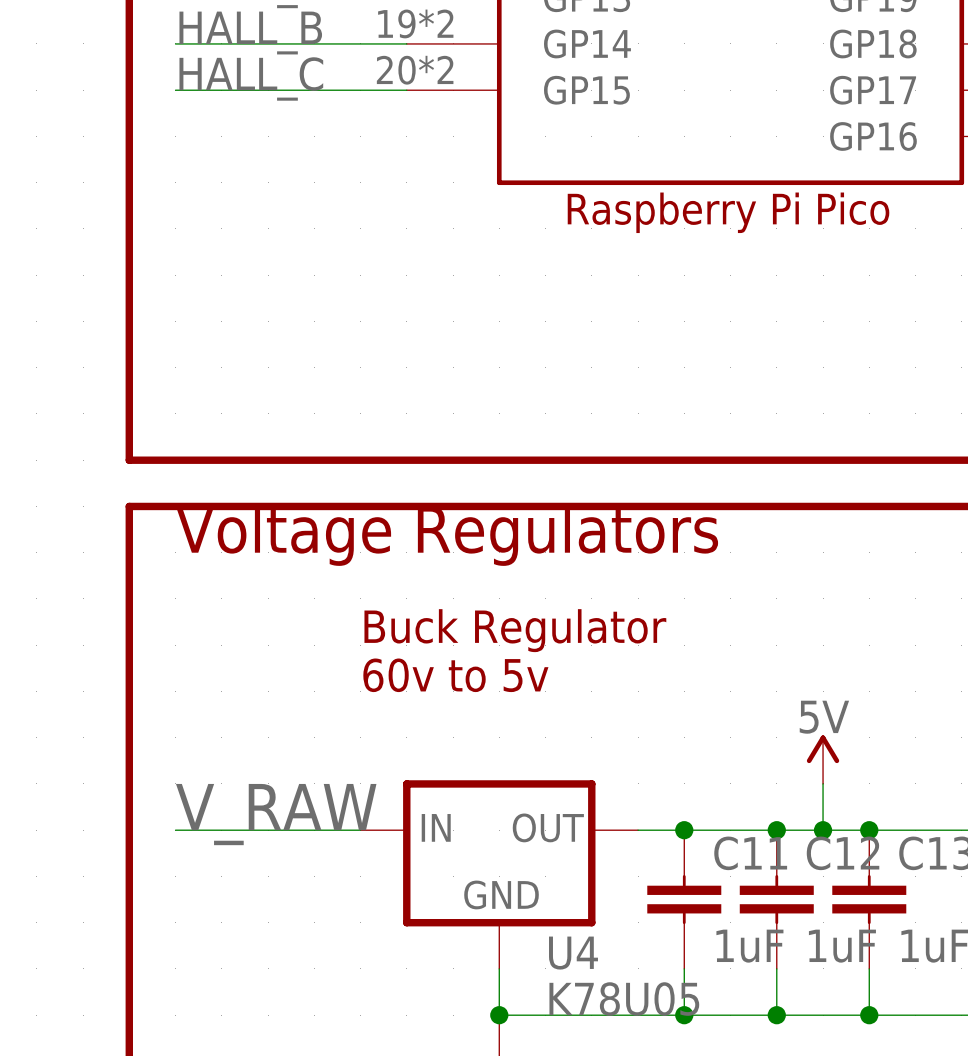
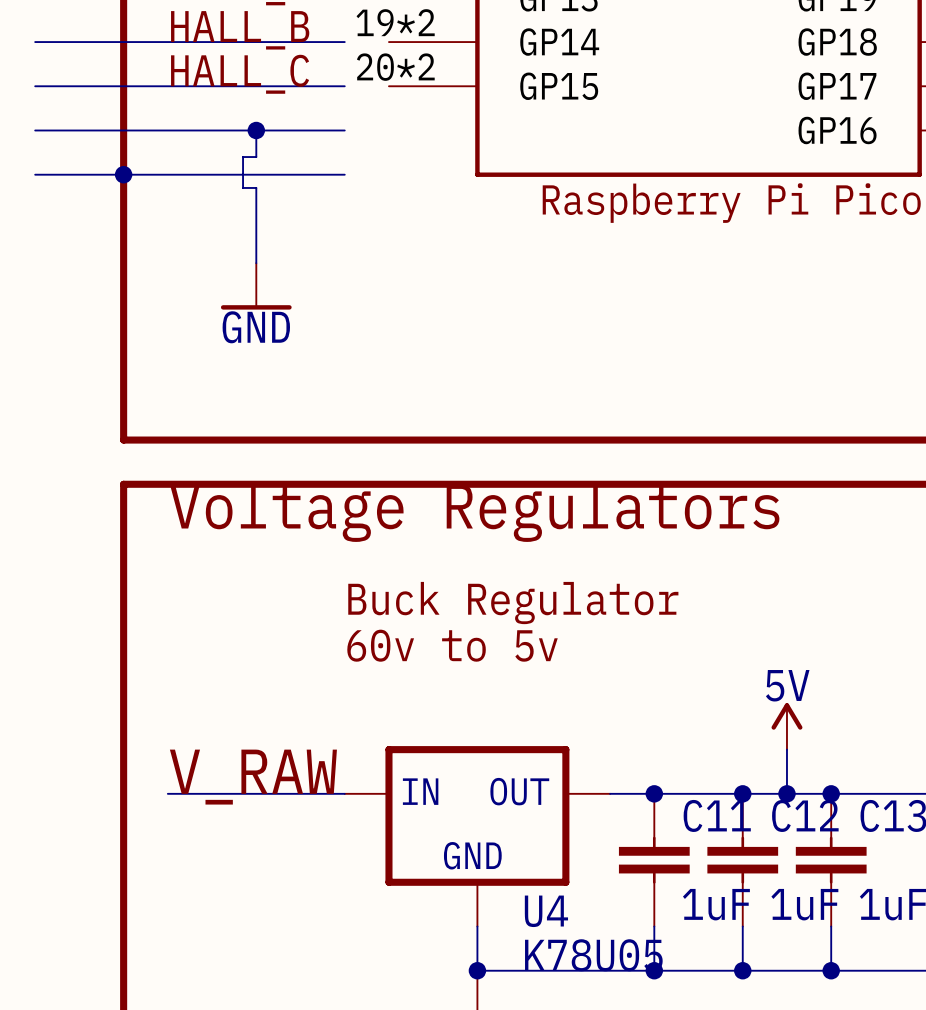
wire: none -> (35, 42) (167, 42)
wire: (360, 43) (406, 43) -> none
wire: none -> (35, 86) (167, 86)
wire: (360, 90) (406, 90) -> none
wire: none -> (35, 130) (344, 130)
wire: none -> (256, 130) (256, 157) (243, 157) (243, 187) (256, 187) (256, 263)
junction: none -> (256, 130)
wire: none -> (35, 174) (344, 174)
junction: none -> (123, 174)
power symbol: none -> GND (256, 286)

